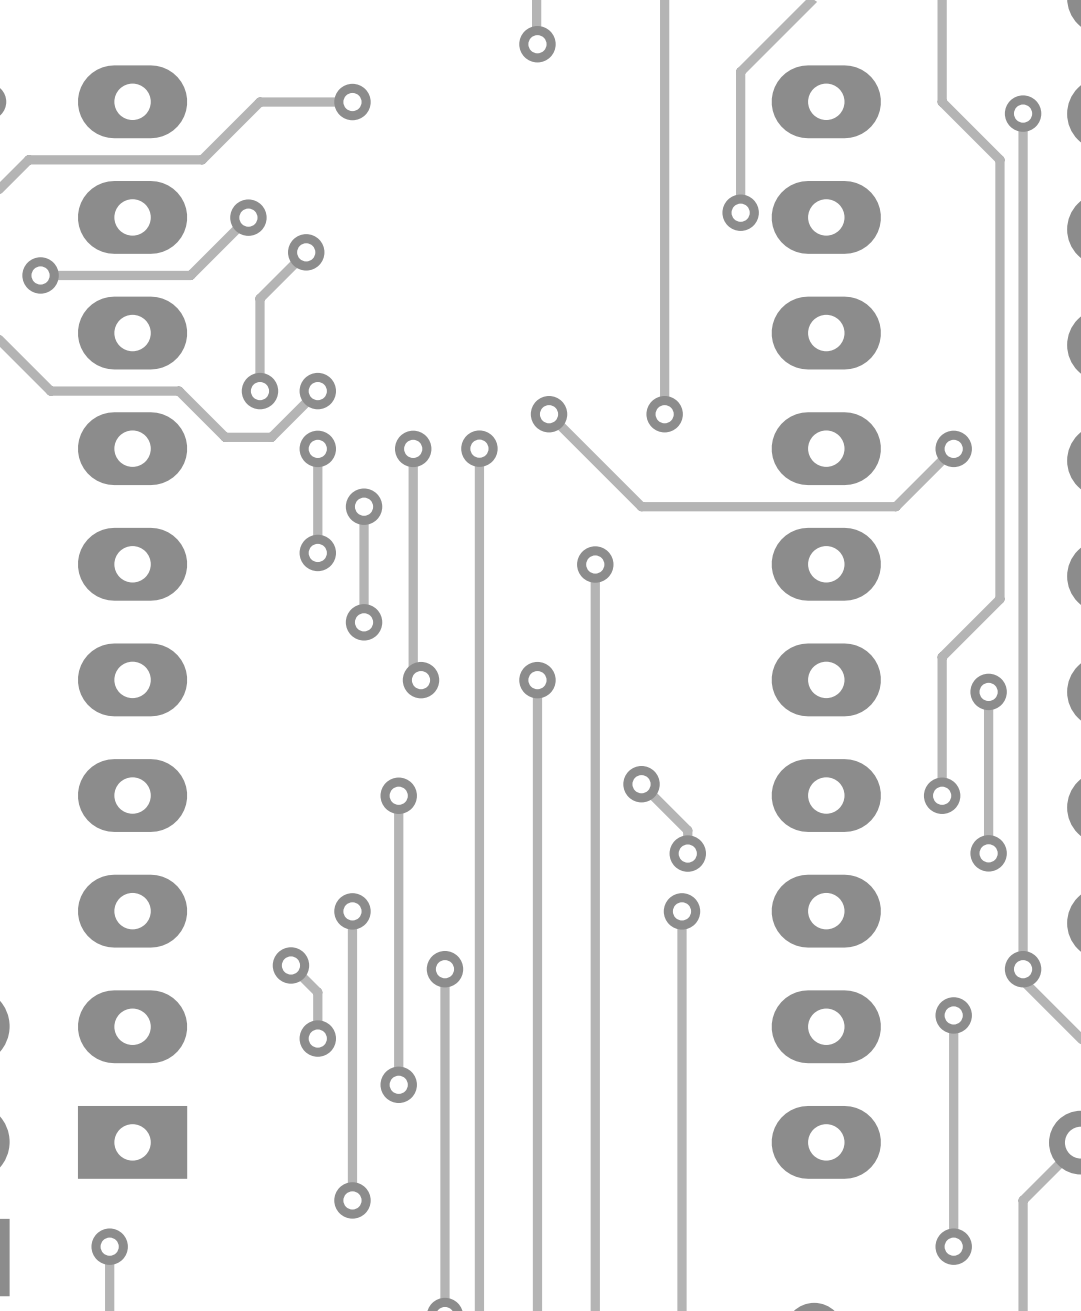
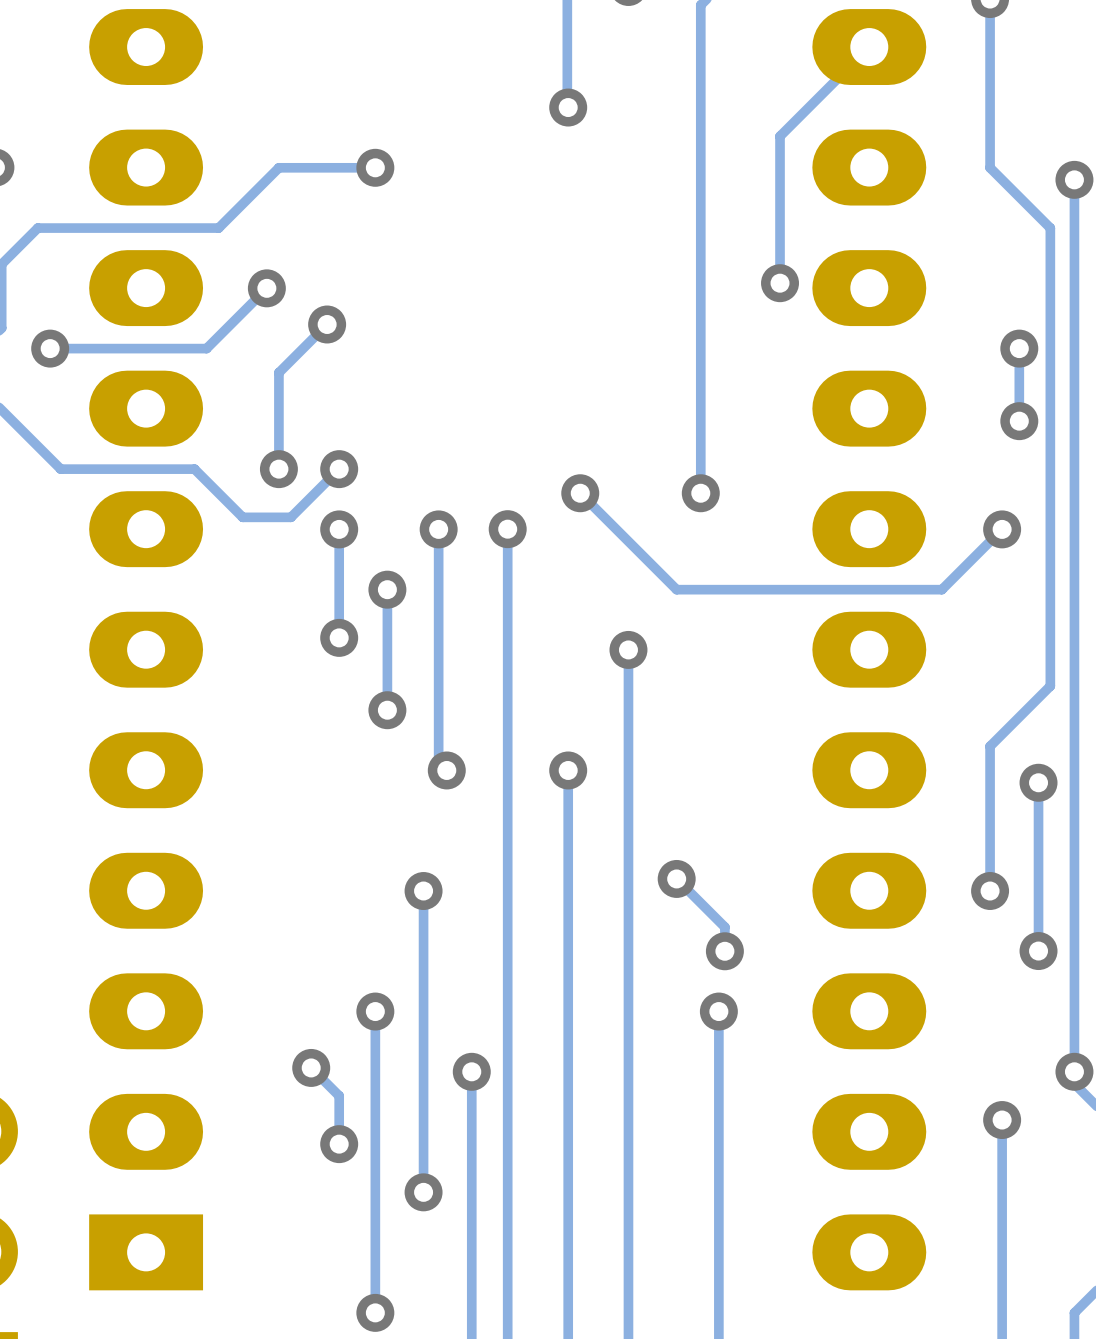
track: none -> (1019, 348) (1019, 421)
via: none -> (1019, 348)
via: none -> (1019, 421)

